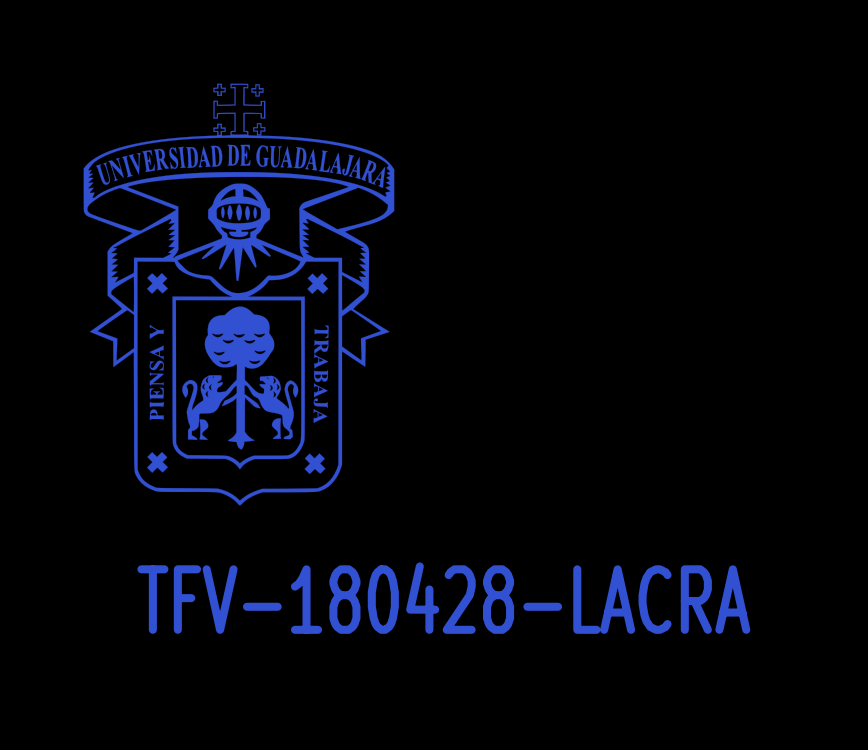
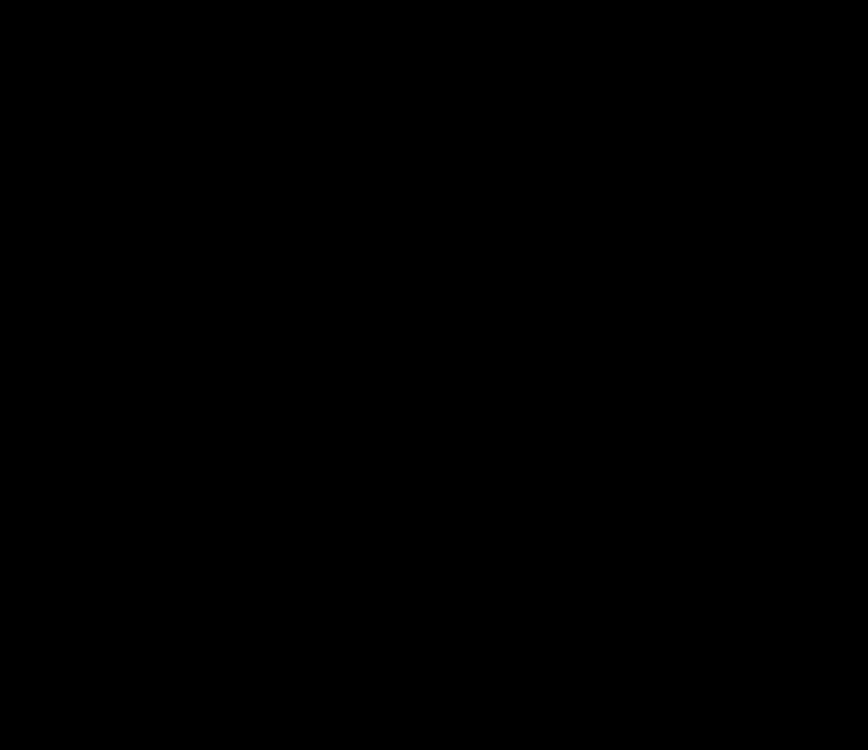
drawing: [83, 83, 395, 506] -> none
text: TFV-180428-LACRA (443, 598) -> none

